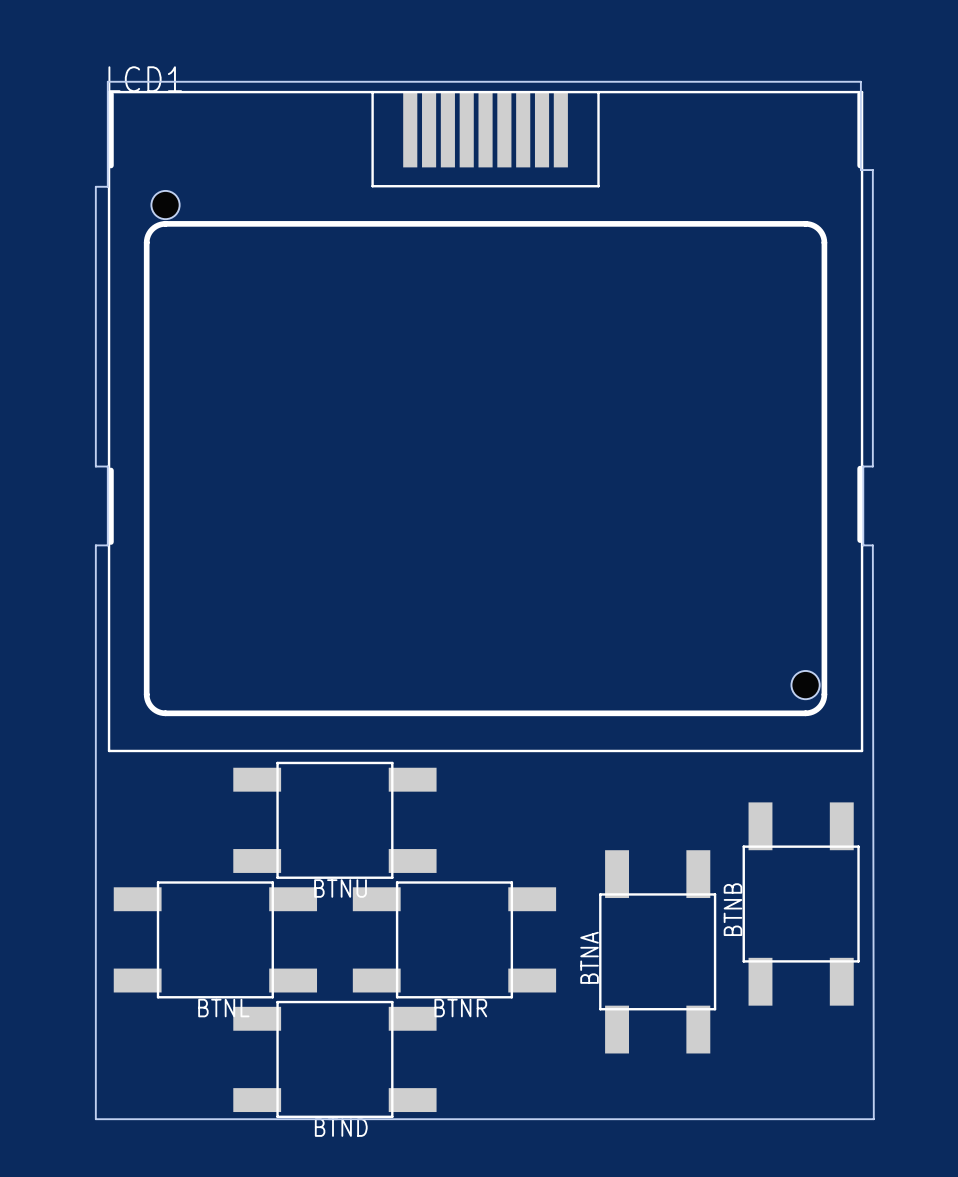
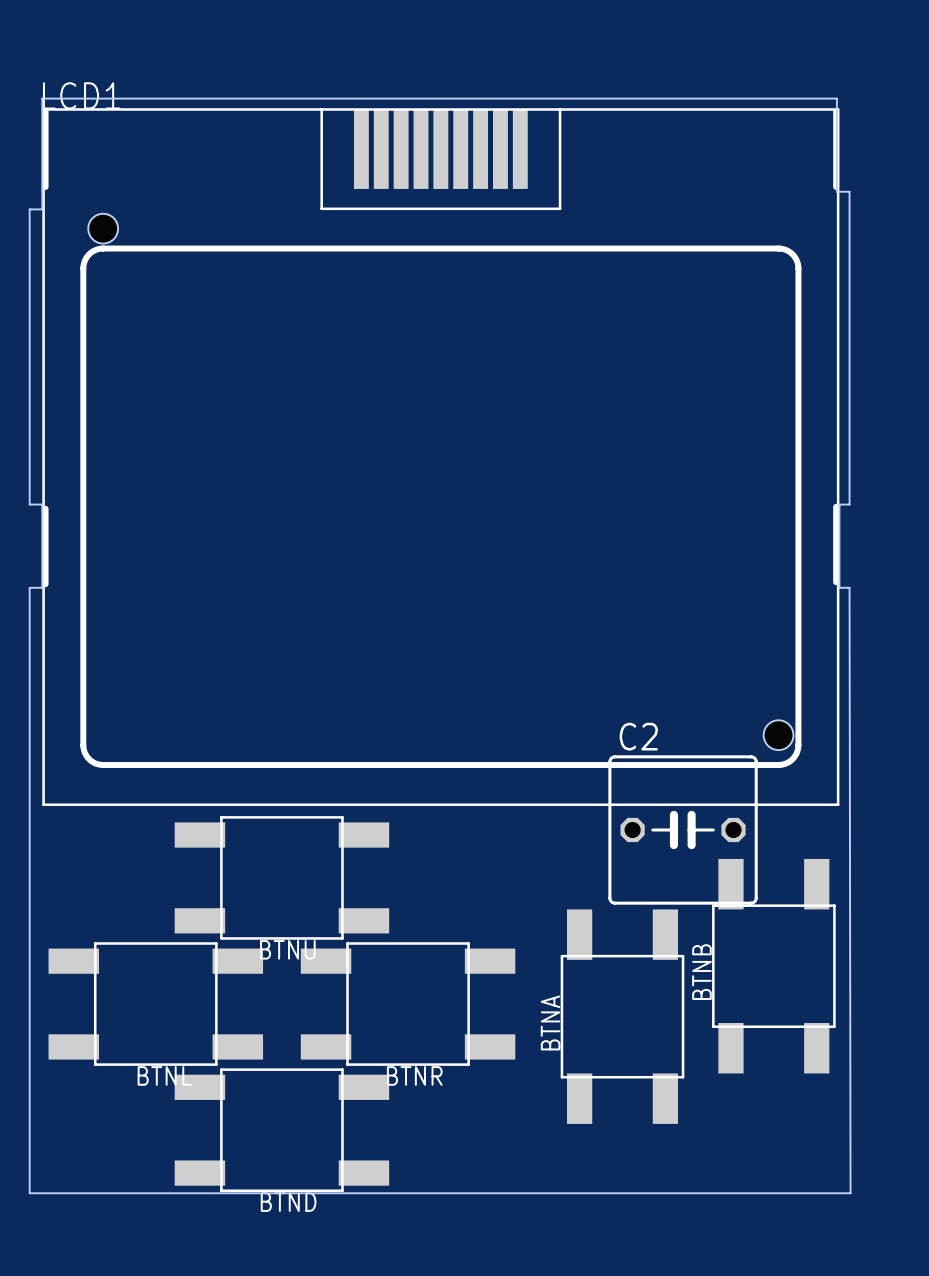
C2: none -> (683, 829)

